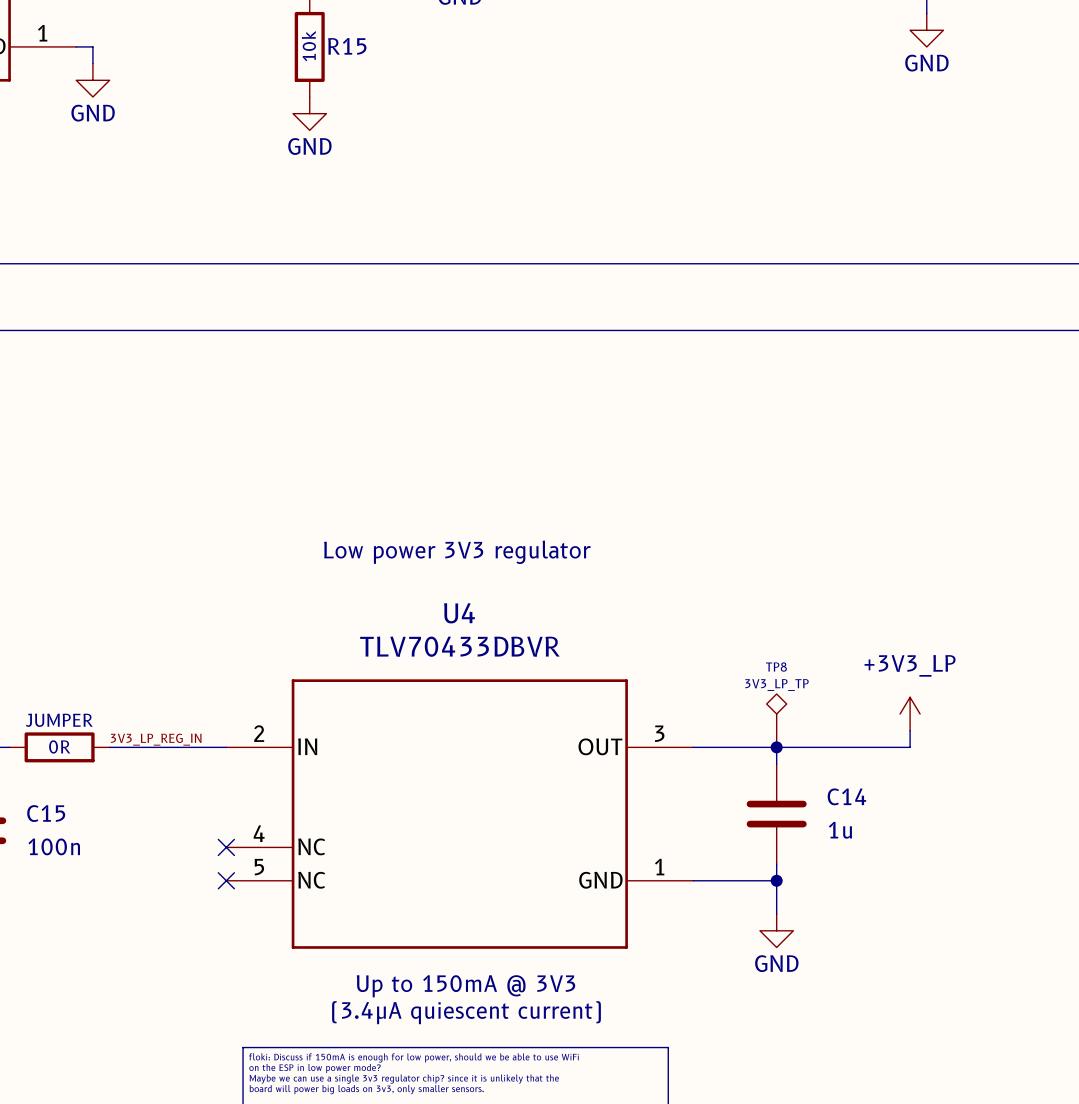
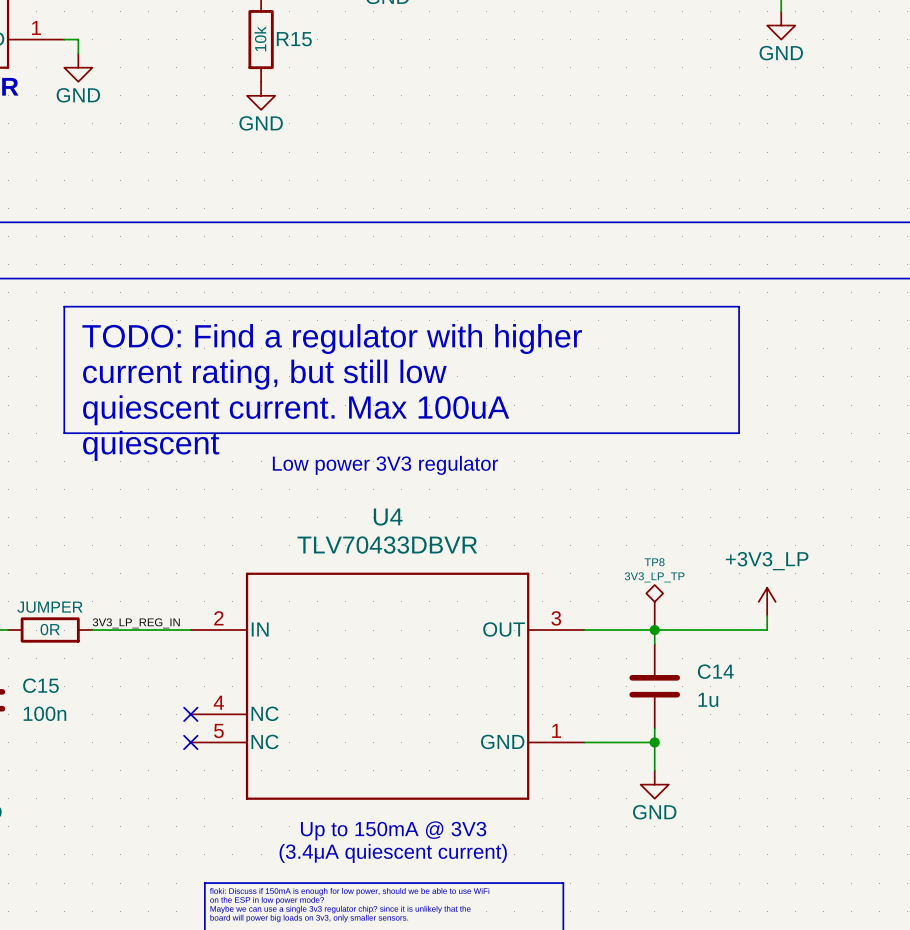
line: none -> (64, 306) (739, 306) (739, 433) (64, 433) (64, 306)
text: none -> TODO: Find a regulator with higher (332, 339)
text: none -> current rating, but still low (264, 374)
text: none -> quiescent current. Max 100uA (296, 410)
text: none -> quiescent (151, 445)

